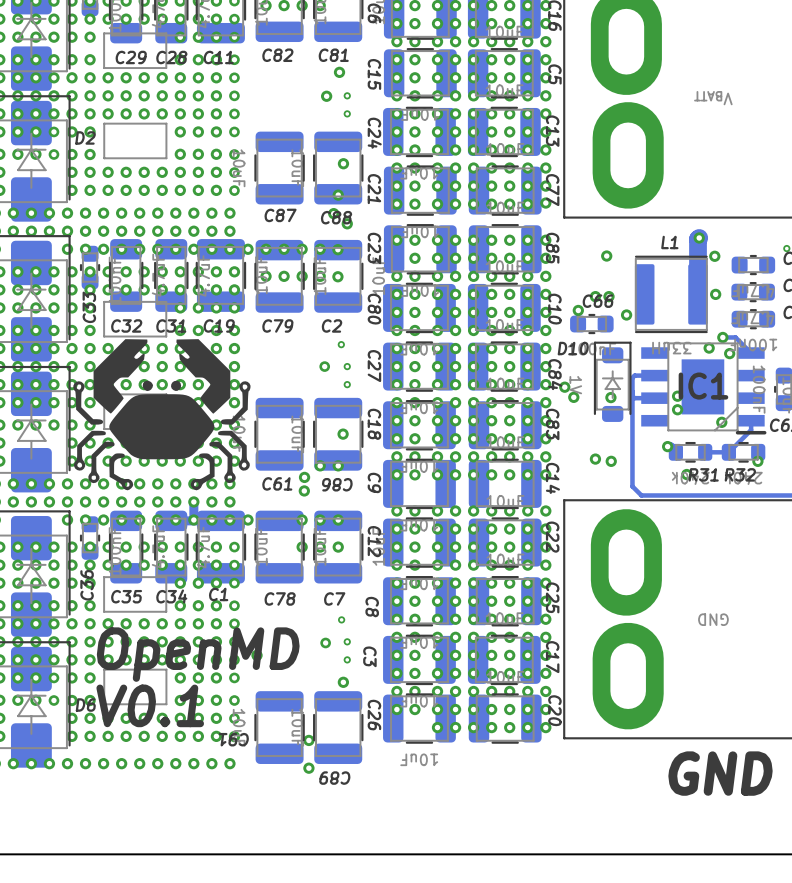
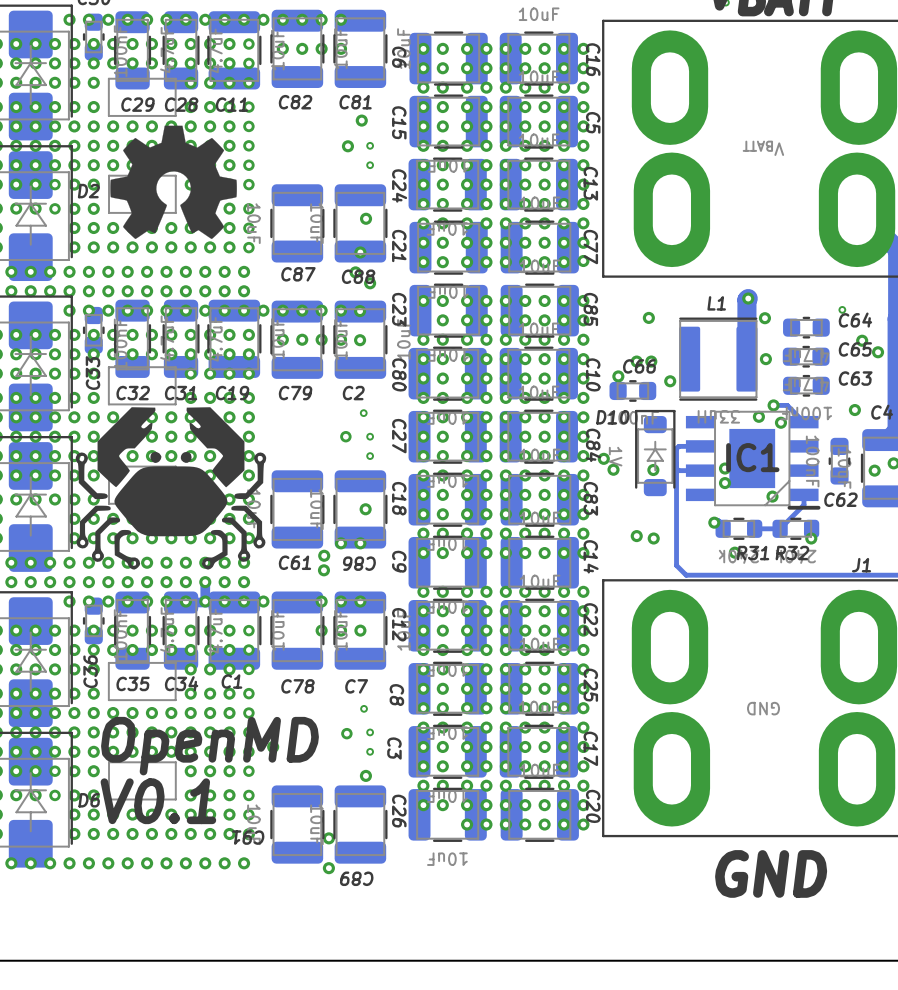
drawing: none -> [110, 125, 237, 240]

